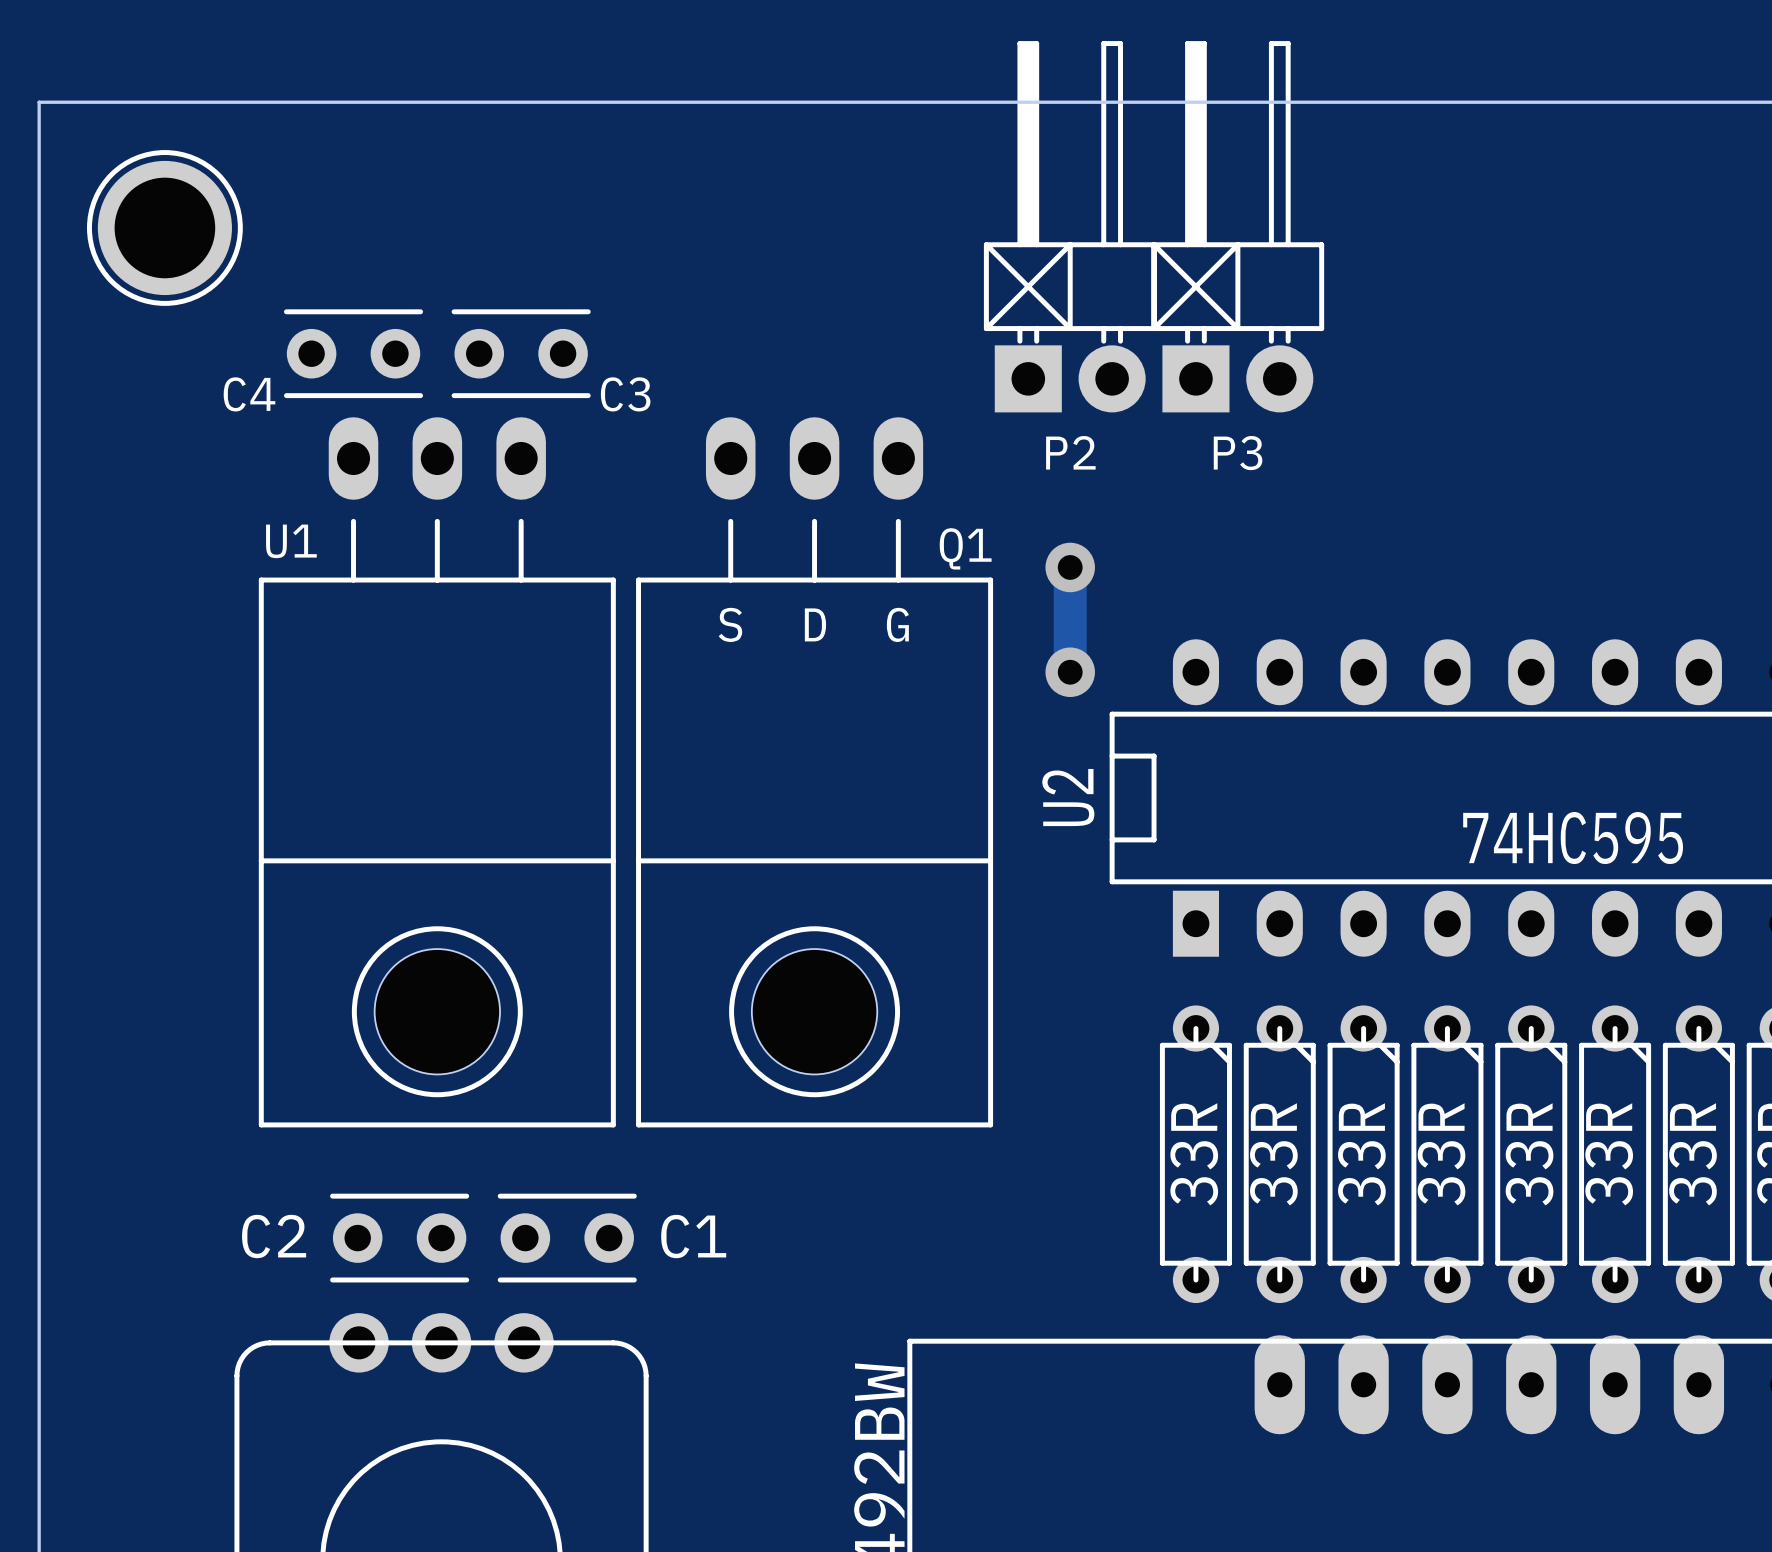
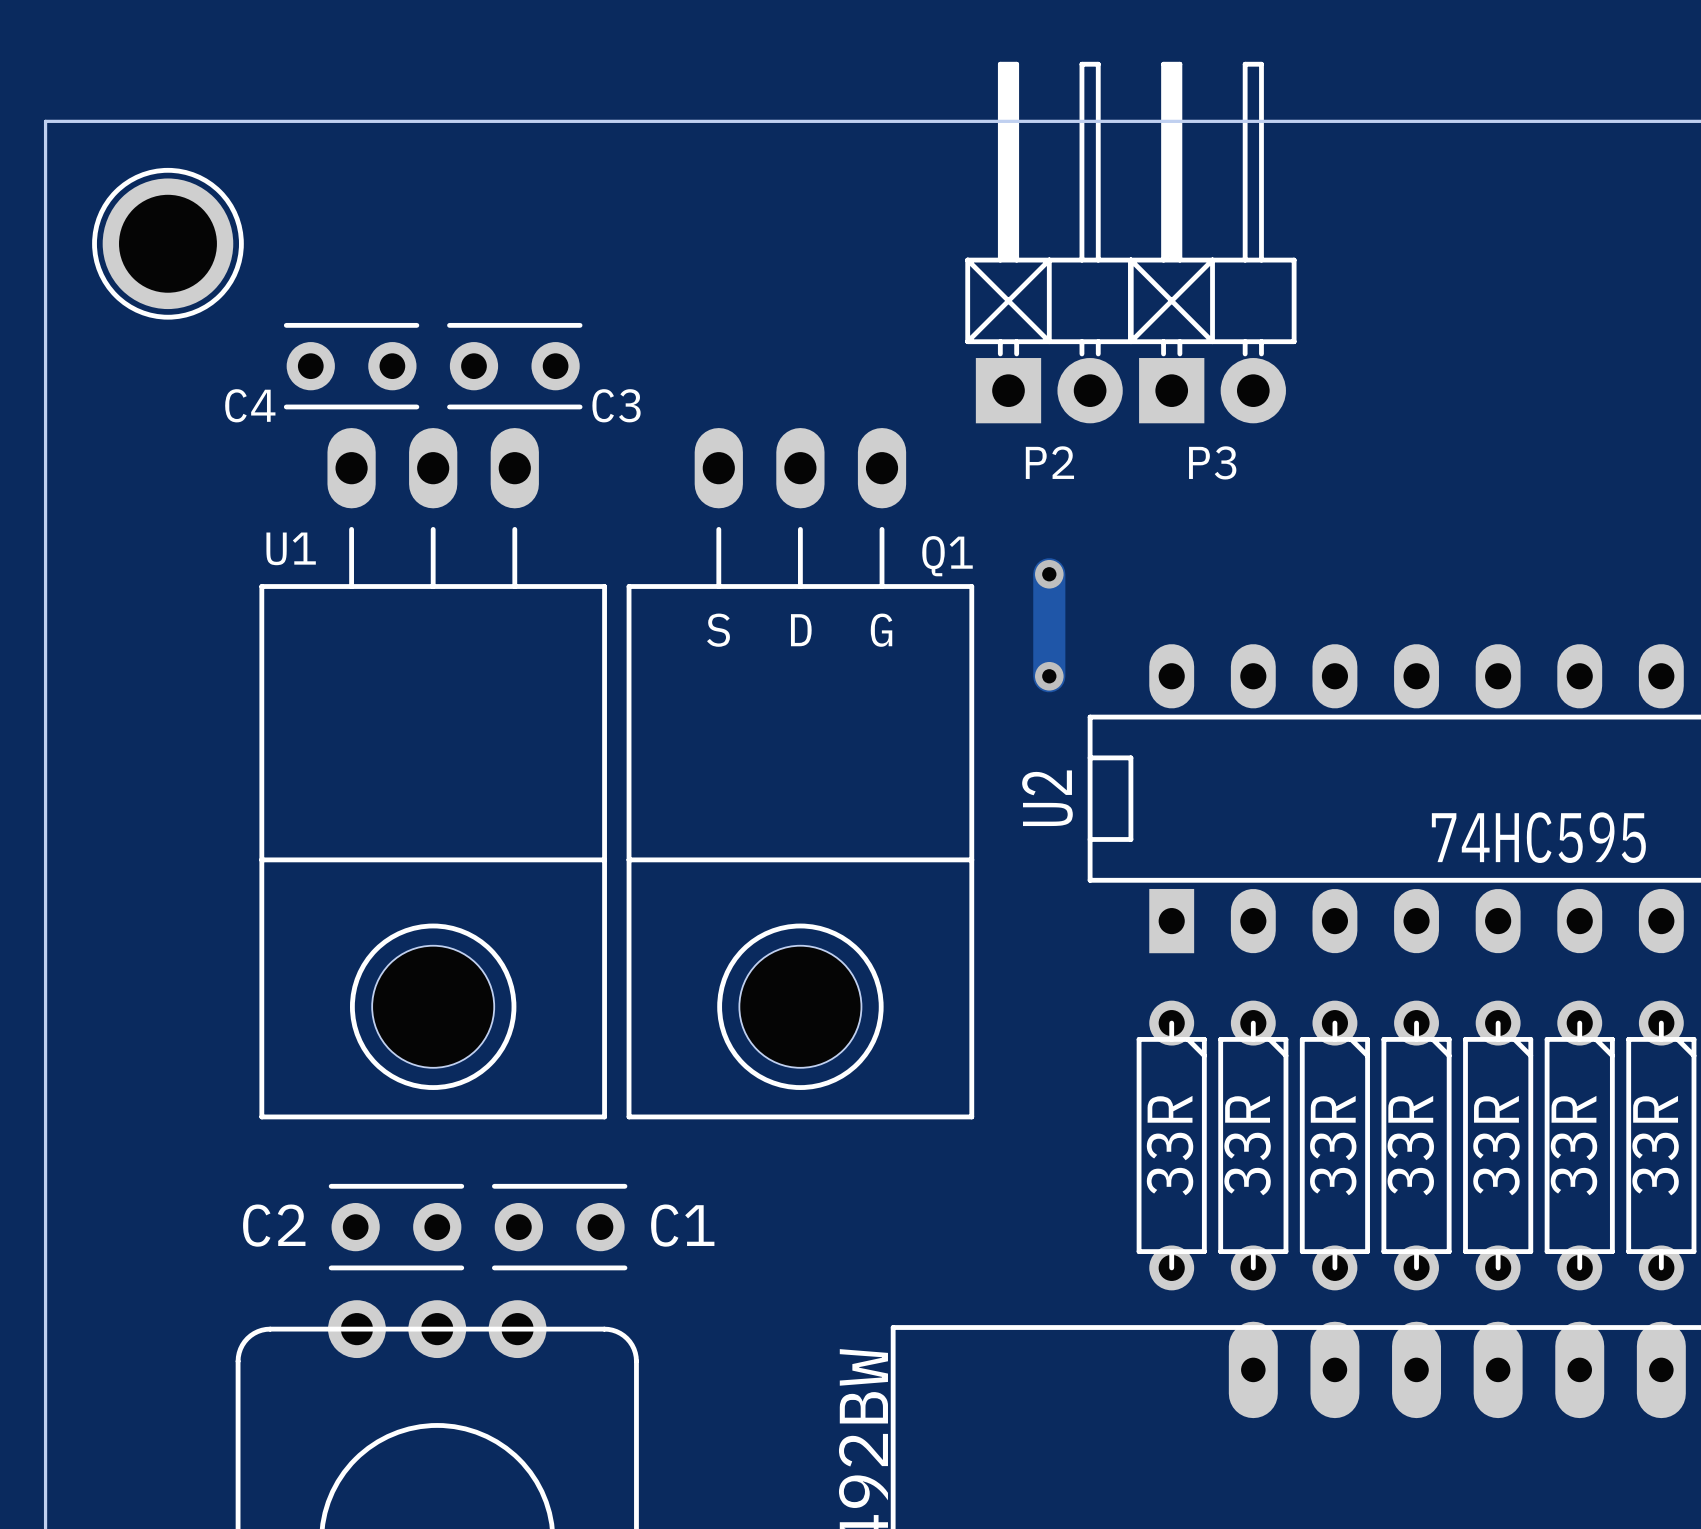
via size: [1045, 542, 1095, 593] -> [1035, 559, 1064, 589]
via size: [1045, 647, 1095, 698] -> [1035, 661, 1064, 691]

